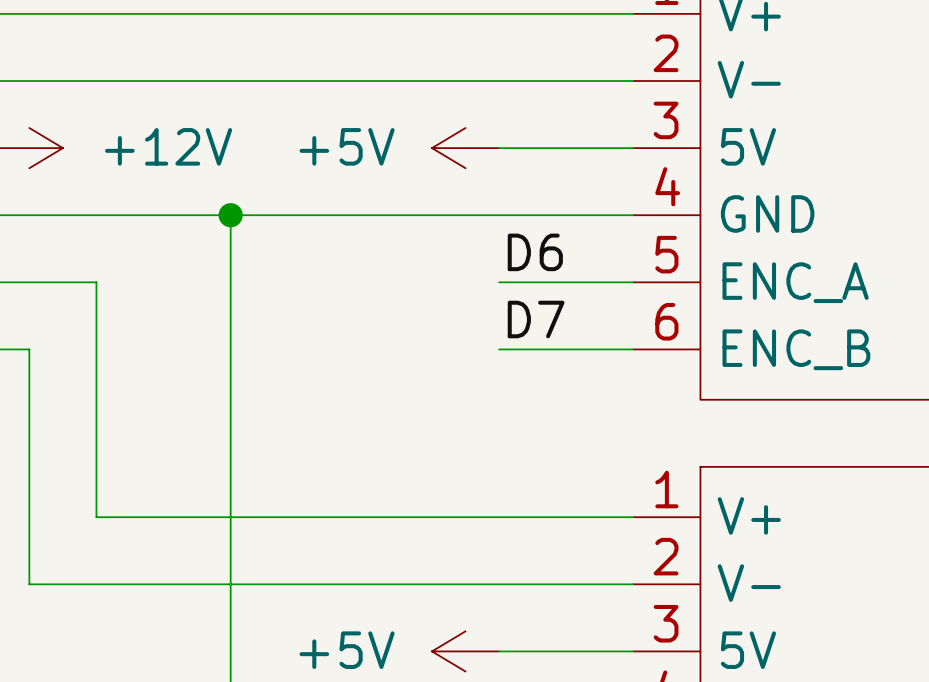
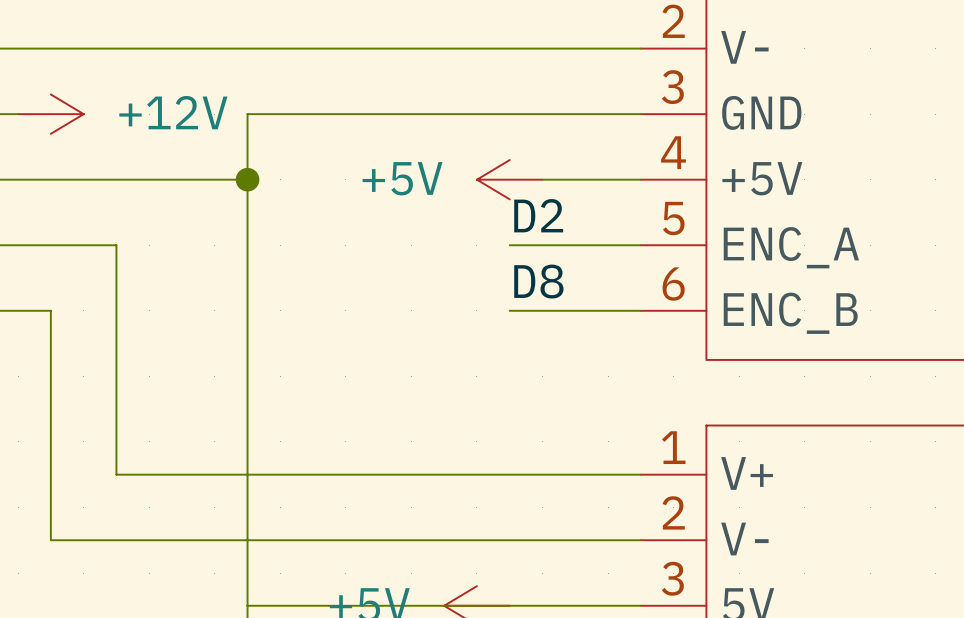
part pin name: 5V (748, 146) -> GND (761, 112)
power symbol position: +5V (465, 148) -> +5V (509, 179)
part pin name: GND (767, 213) -> +5V (762, 178)
wire: (230, 215) (532, 215) -> (247, 179) (247, 114) (509, 114)
label: D6 (535, 252) -> D2 (538, 215)
label: D7 (536, 319) -> D8 (538, 281)
wire: none -> (247, 605) (509, 605)

